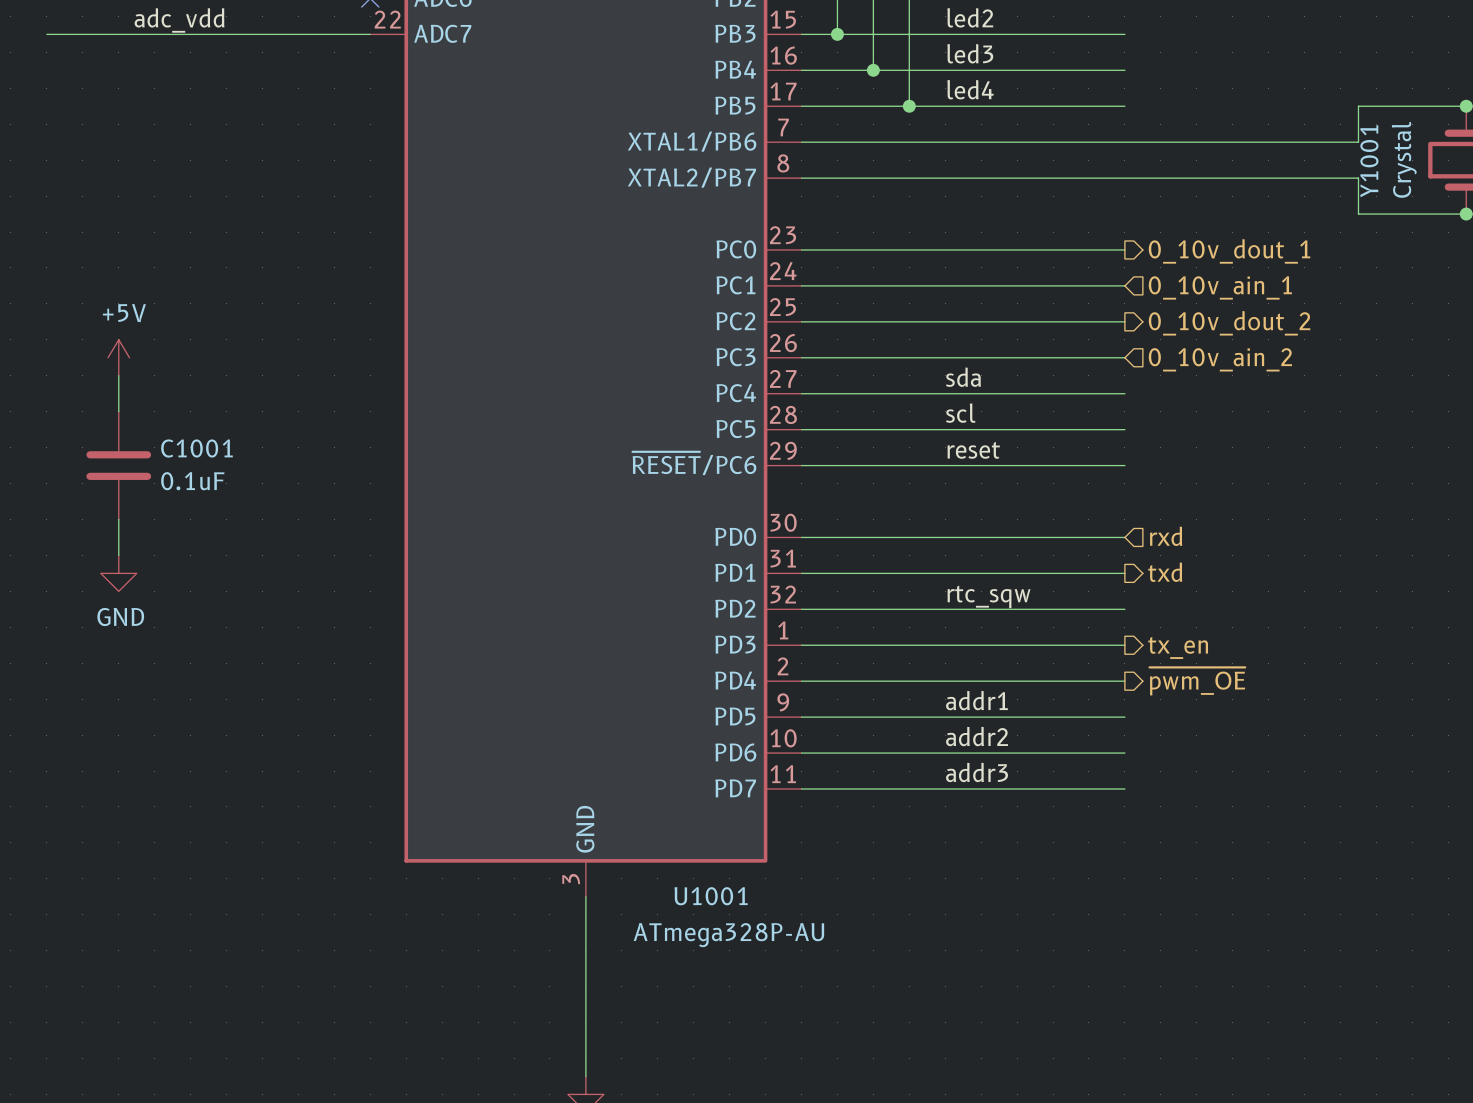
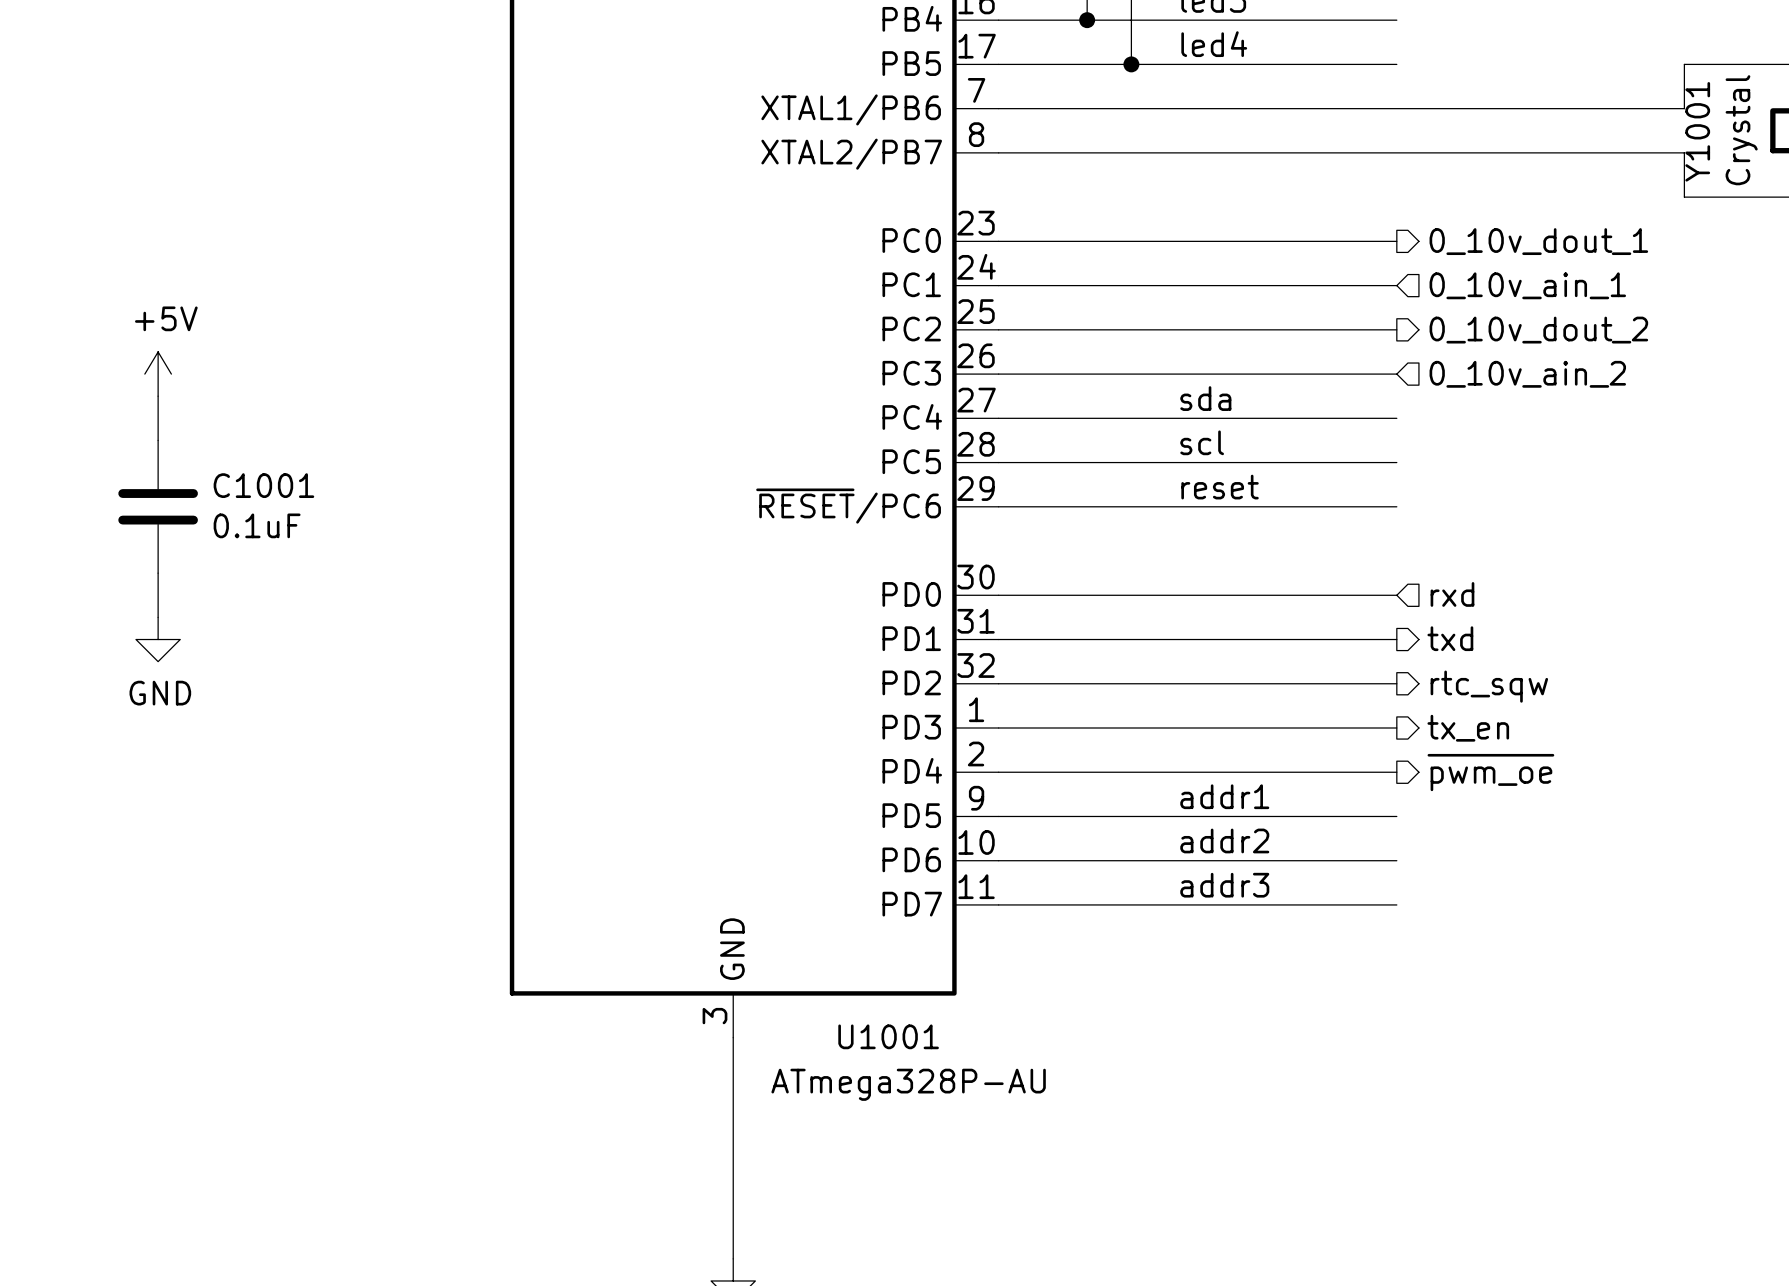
label: rtc_sqw (989, 596) -> none
hierarchical label: none -> rtc_sqw (1489, 686)
hierarchical label: ~{pwm_OE} (1197, 681) -> ~{pwm_oe} (1490, 772)

